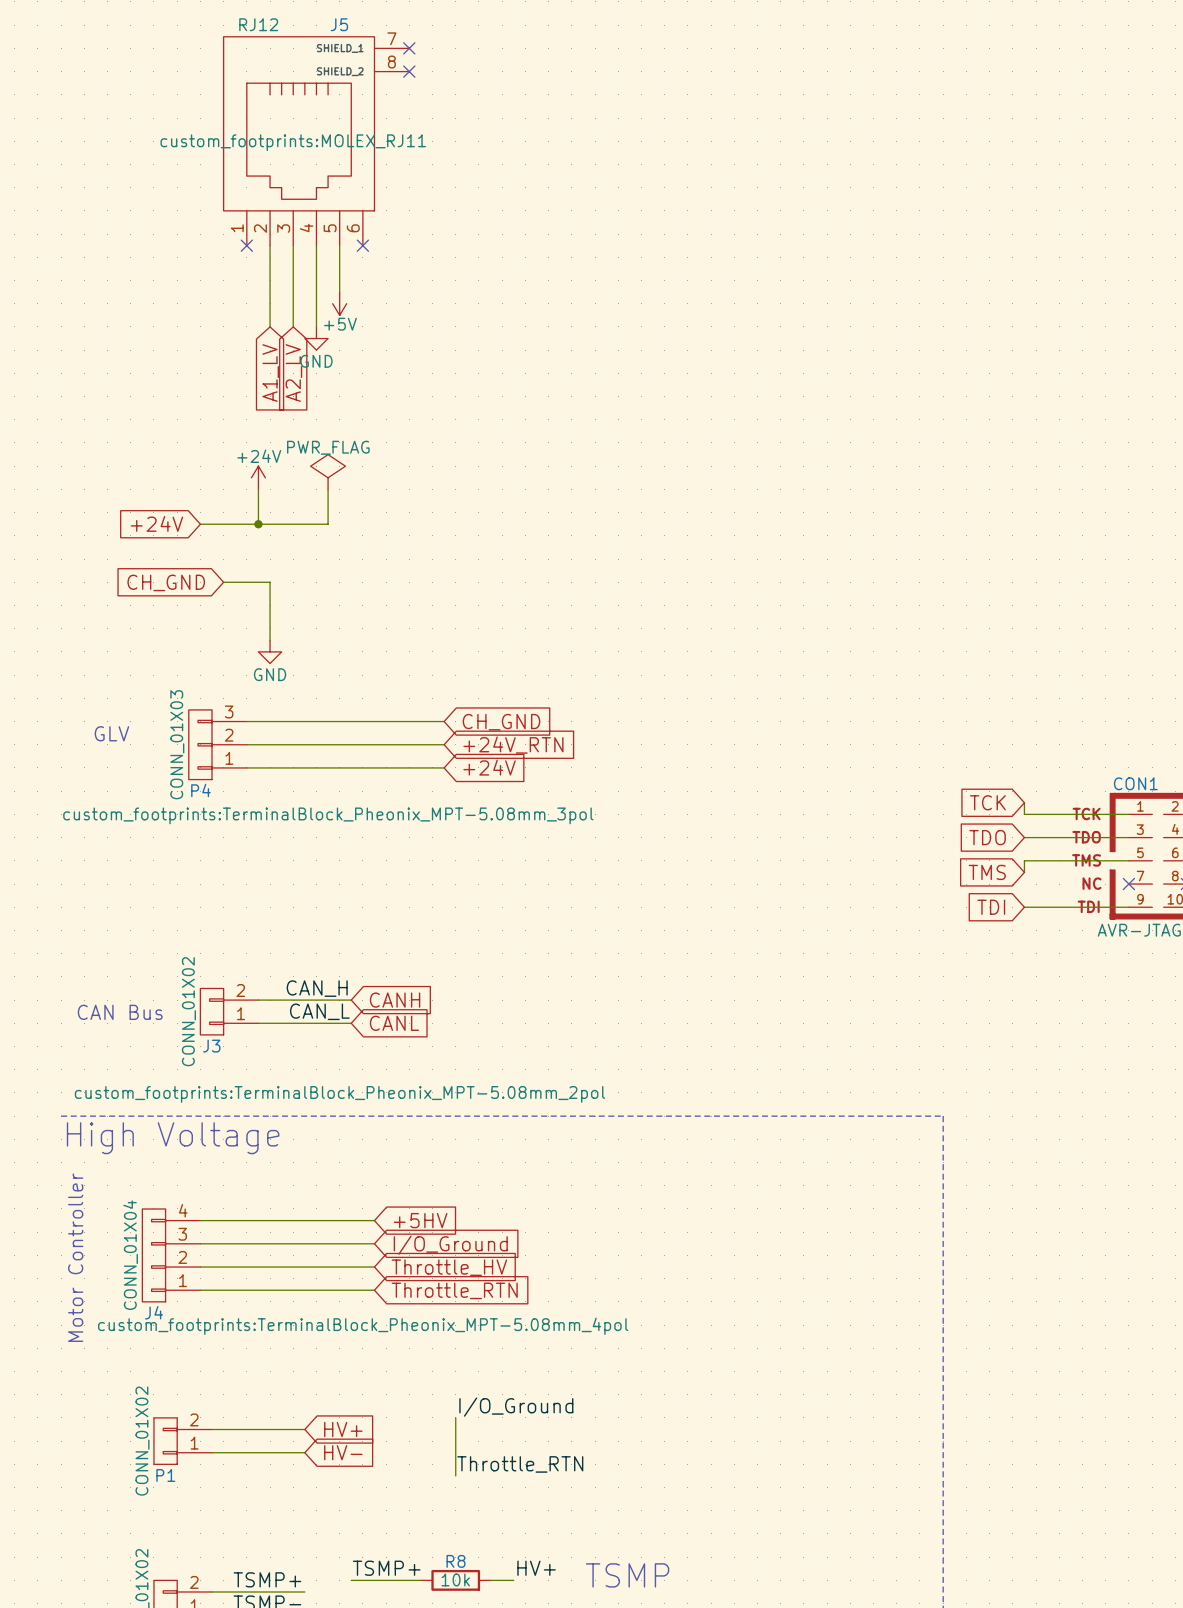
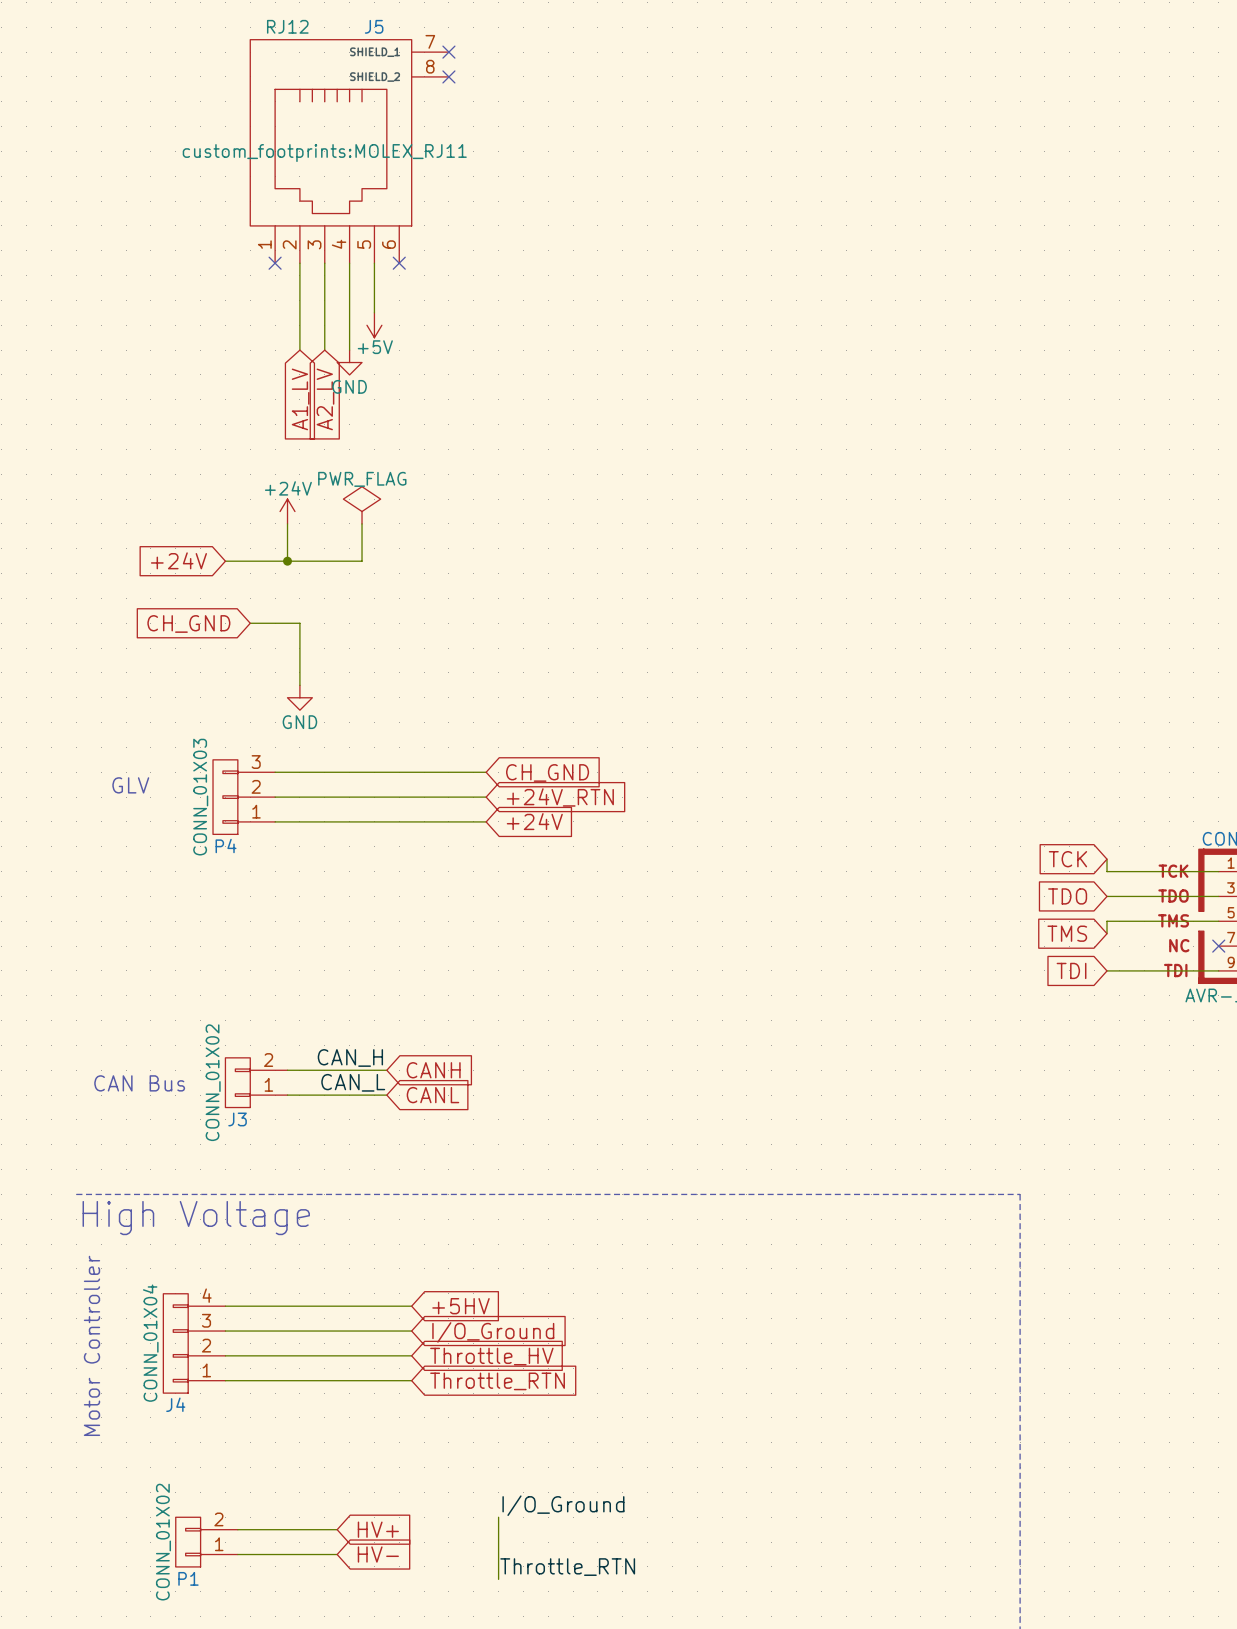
P4 text: custom_footprints:TerminalBlock_Pheonix_MPT-5.08mm_3pol (328, 815) -> none
J3 text: custom_footprints:TerminalBlock_Pheonix_MPT-5.08mm_2pol (339, 1094) -> none
J4 text: custom_footprints:TerminalBlock_Pheonix_MPT-5.08mm_4pol (363, 1326) -> none

